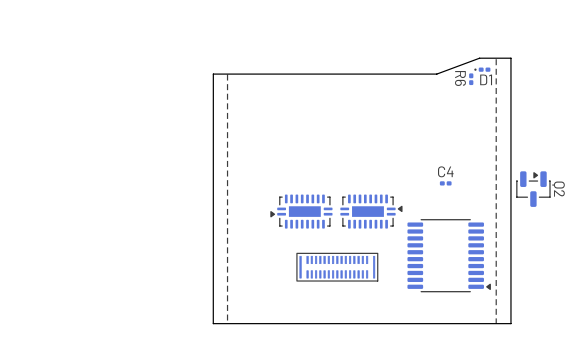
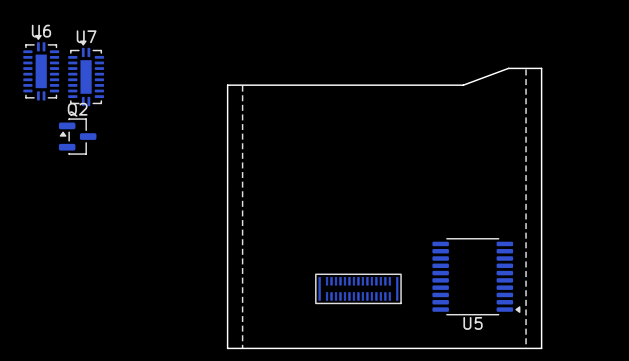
U6: none -> (41, 67)
U7: none -> (86, 73)
D1: (482, 69) -> none
R6: (471, 79) -> none
C4: (445, 183) -> none
Q2 rotation: 0° (533, 189) -> 90° counterclockwise (77, 136)
Q2 position: (533, 189) -> (77, 136)
part: (301, 211) -> none
part: (371, 211) -> none
U5 name: none -> U5 (473, 323)

